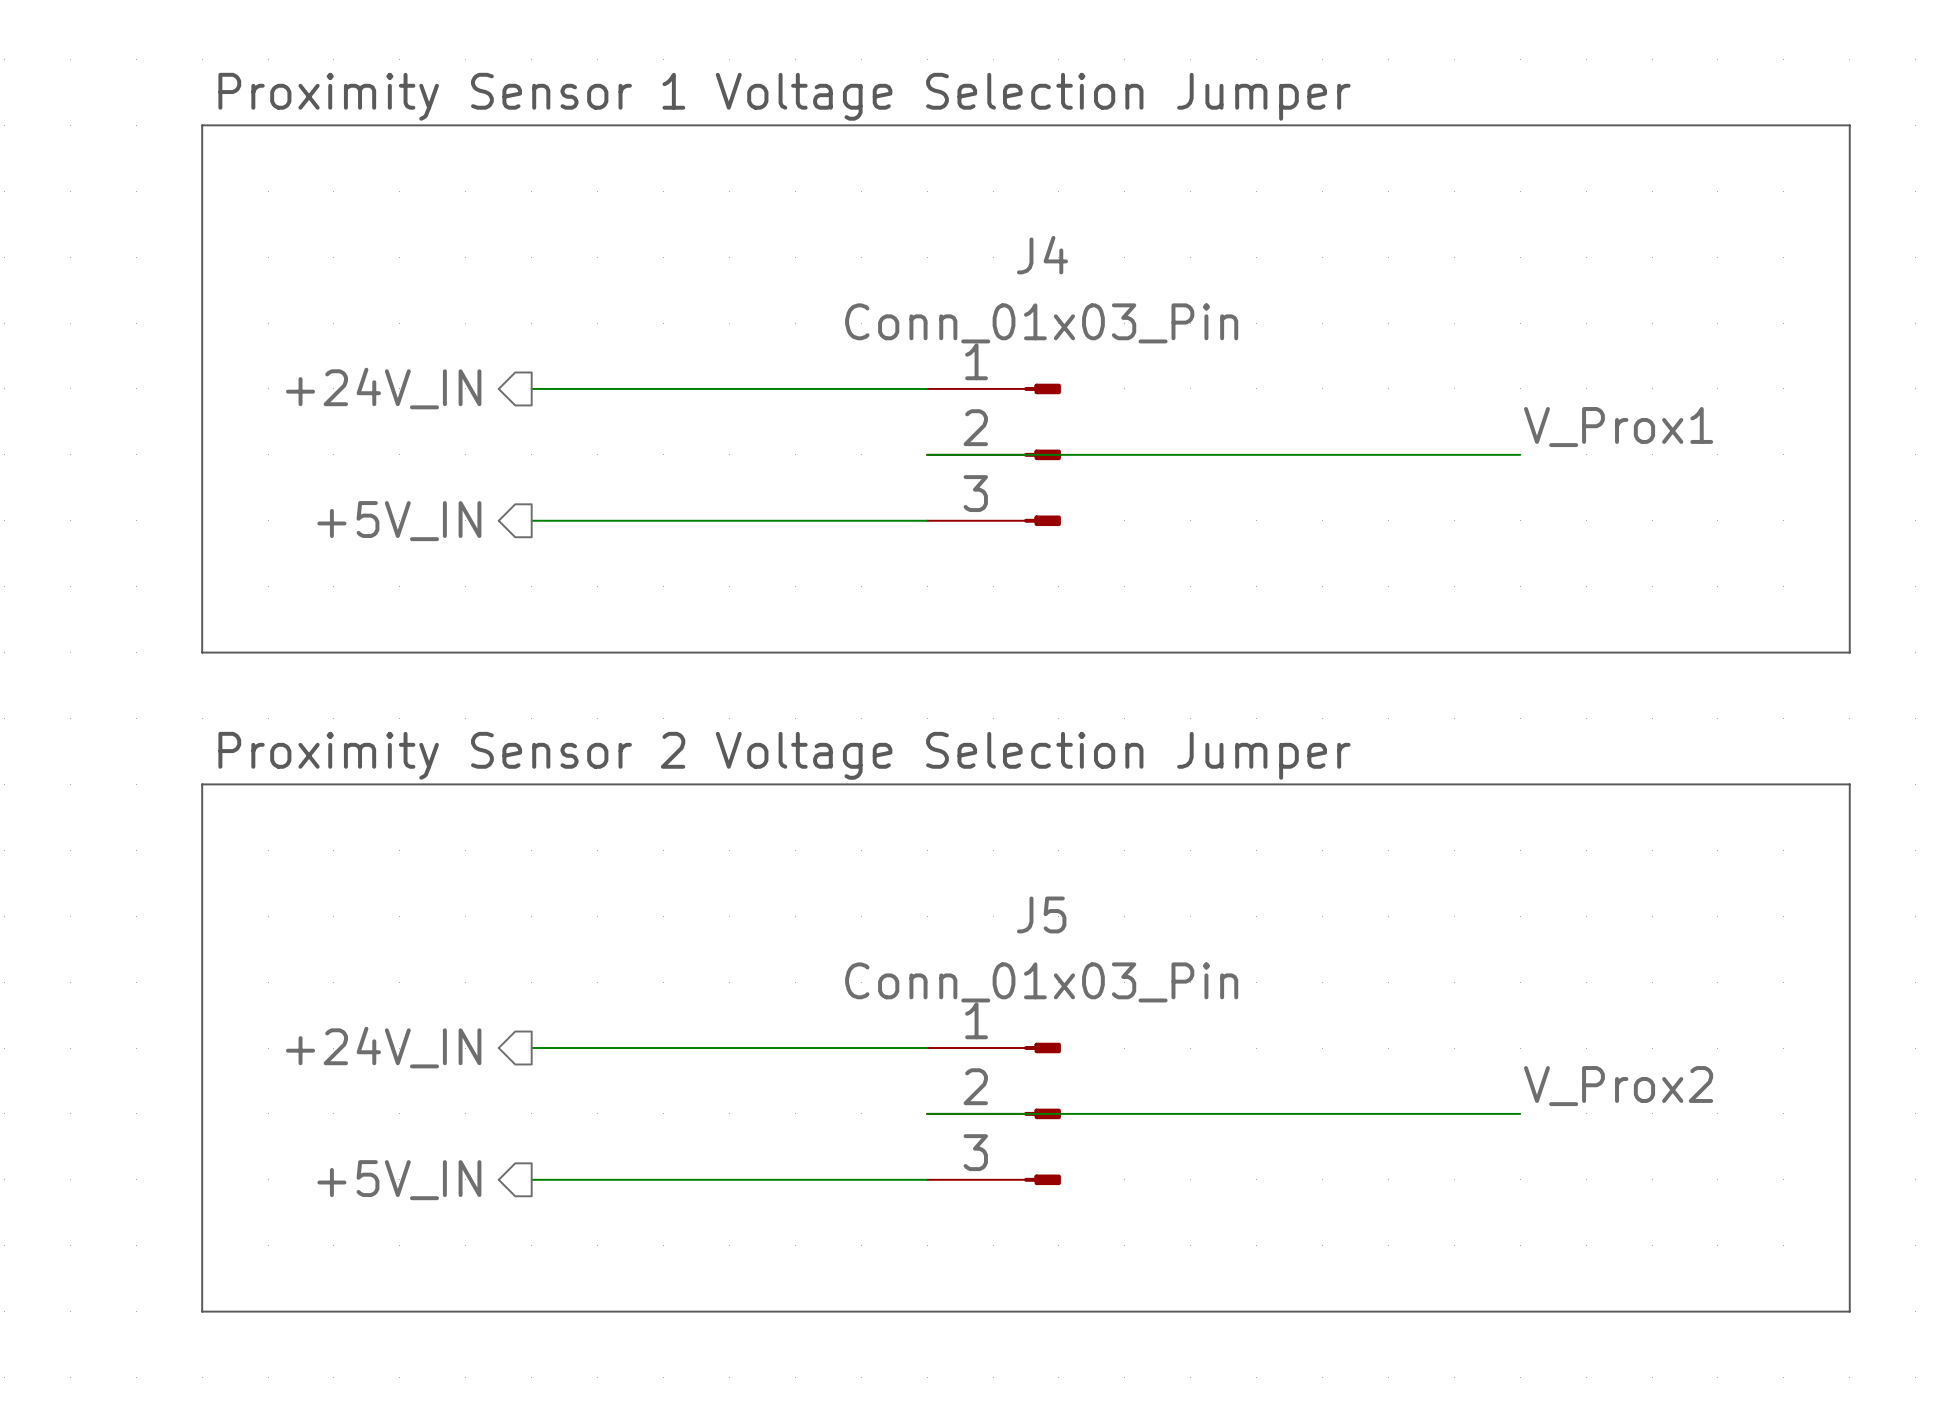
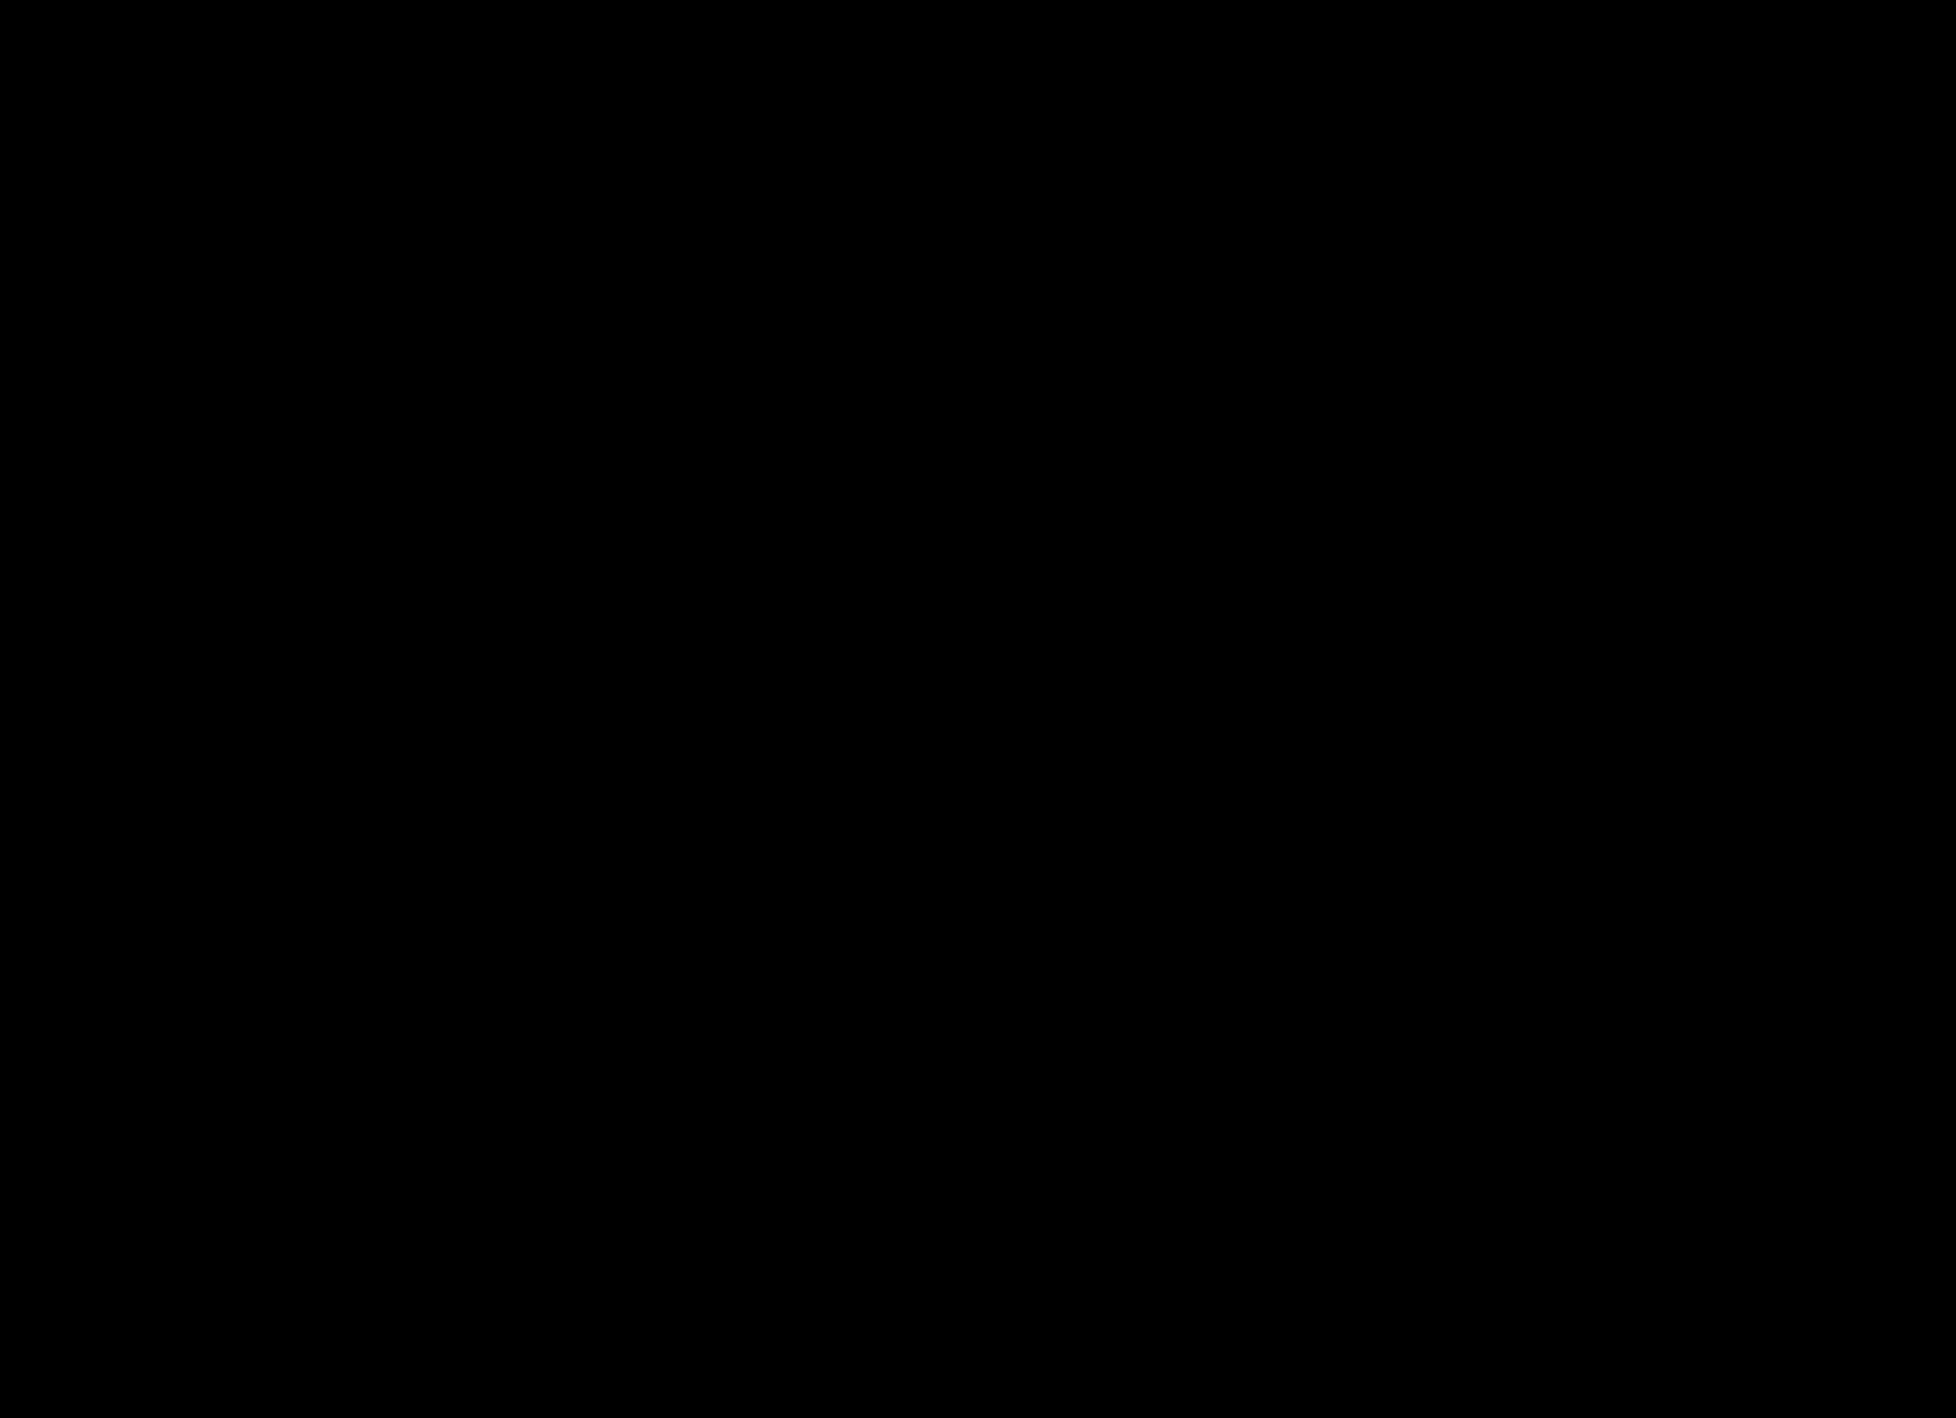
text: Proximity Sensor 1 Voltage Selection Jumper (784, 96) -> none
line: (202, 125) (202, 652) (1849, 652) (1849, 125) (202, 125) -> none
hierarchical label: +24V_IN (383, 388) -> none
wire: (531, 388) (927, 388) -> none
label: V_Prox1 (1618, 427) -> none
wire: (927, 454) (1520, 454) -> none
J4: Conn_01x03_Pin (994, 454) -> none
wire: (531, 520) (927, 520) -> none
hierarchical label: +5V_IN (399, 521) -> none
text: Proximity Sensor 2 Voltage Selection Jumper (784, 755) -> none
line: (202, 784) (1849, 784) (1849, 1311) (202, 1311) (202, 784) -> none
hierarchical label: +24V_IN (383, 1047) -> none
wire: (531, 1048) (927, 1048) -> none
label: V_Prox2 (1618, 1086) -> none
wire: (927, 1113) (1520, 1113) -> none
J5: Conn_01x03_Pin (994, 1113) -> none
wire: (531, 1179) (927, 1179) -> none
hierarchical label: +5V_IN (399, 1180) -> none

